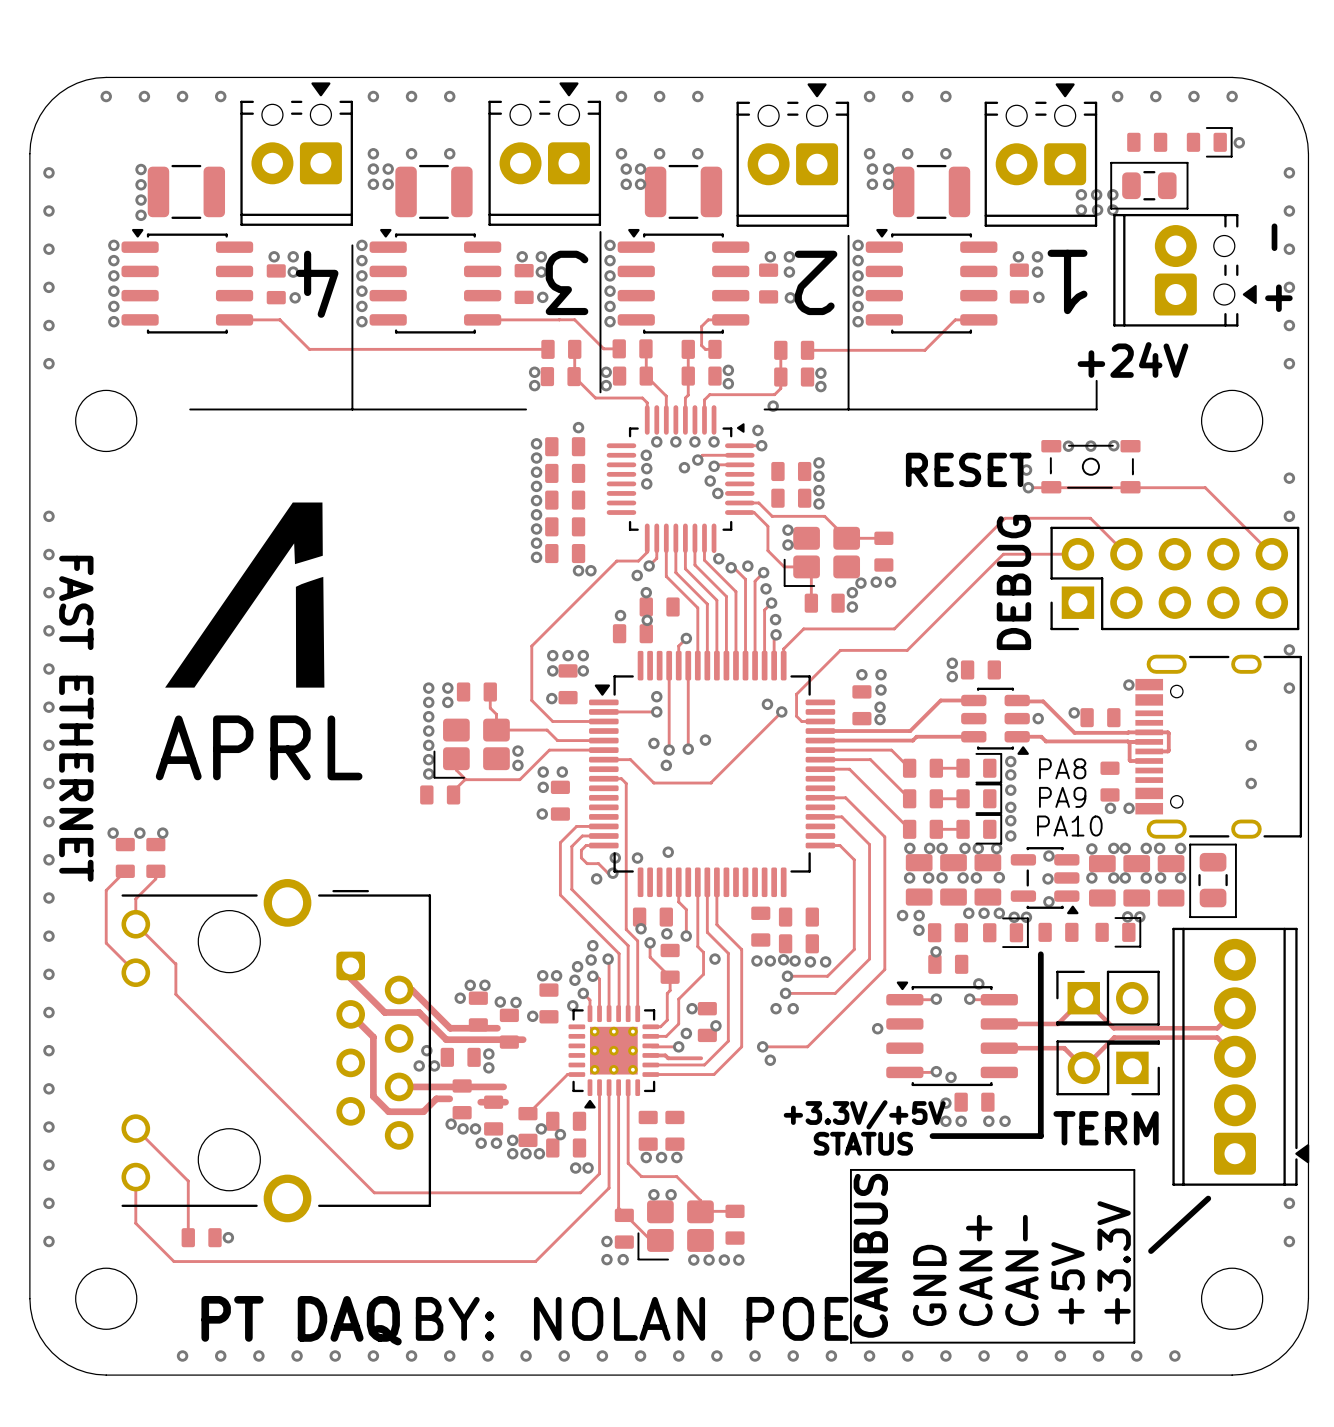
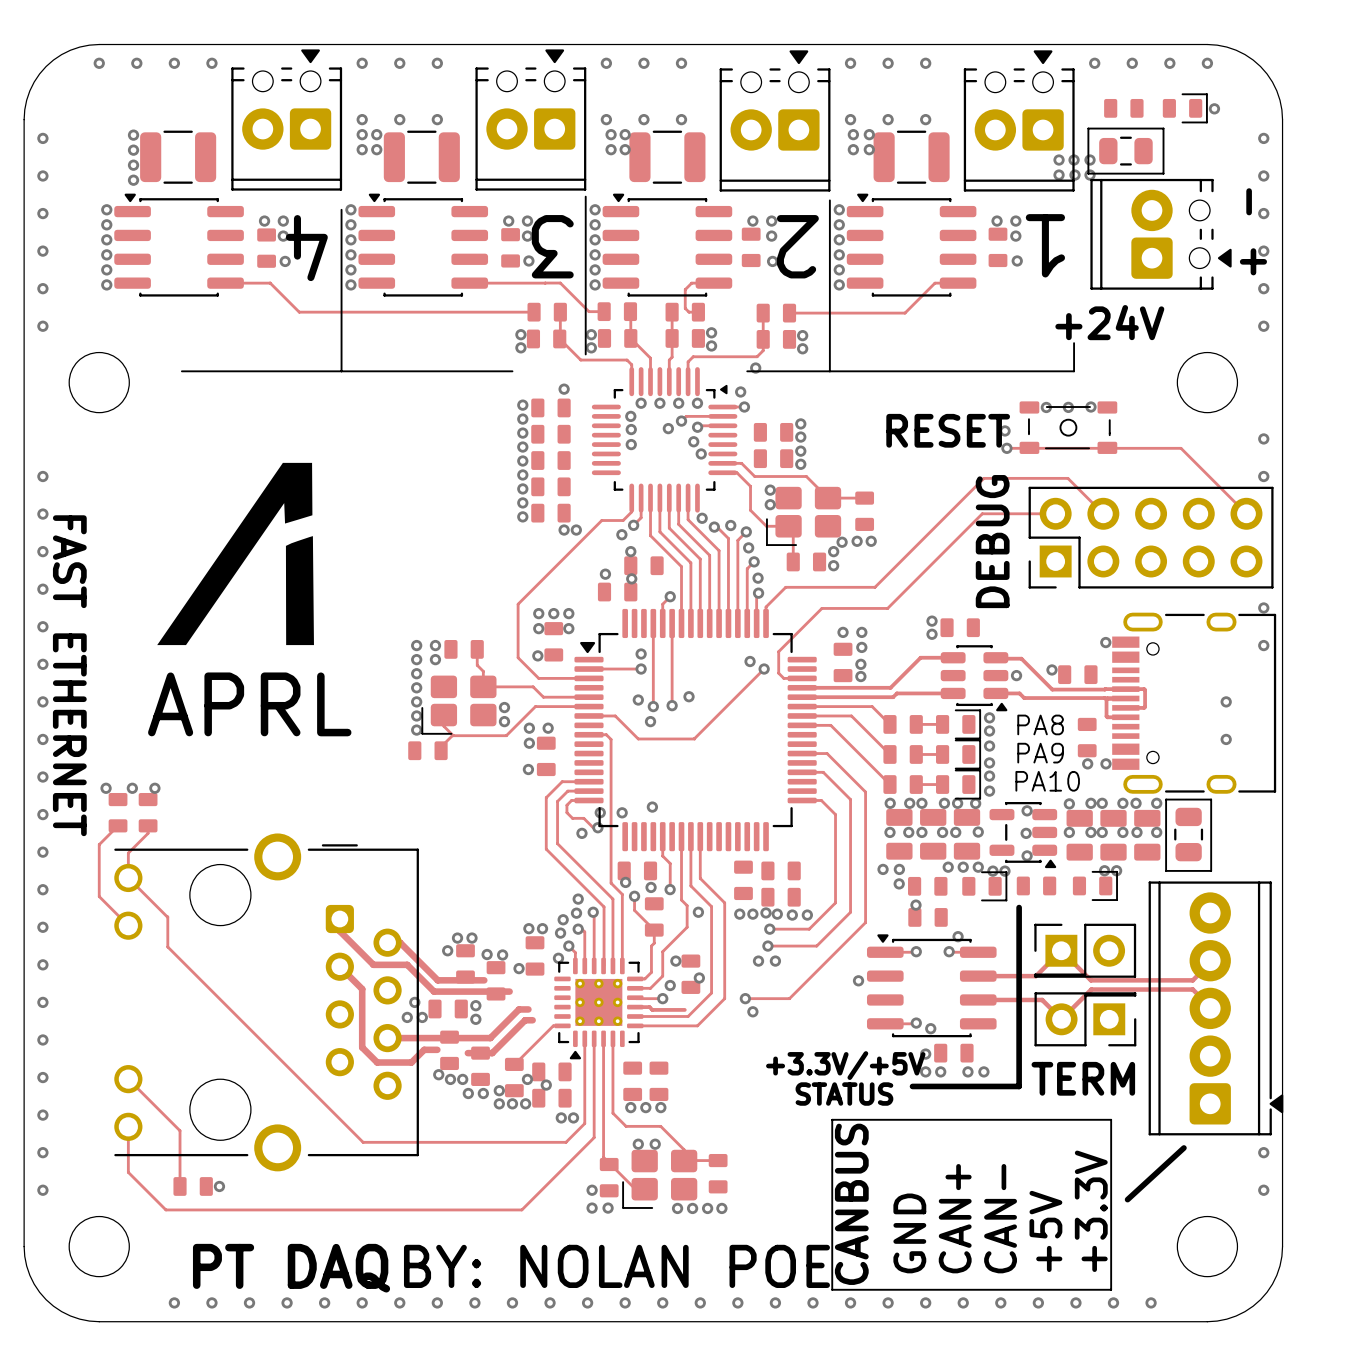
track: none -> (528, 1009) (519, 1009) (490, 1038)
track: none -> (532, 1020) (525, 1020) (492, 1053)

